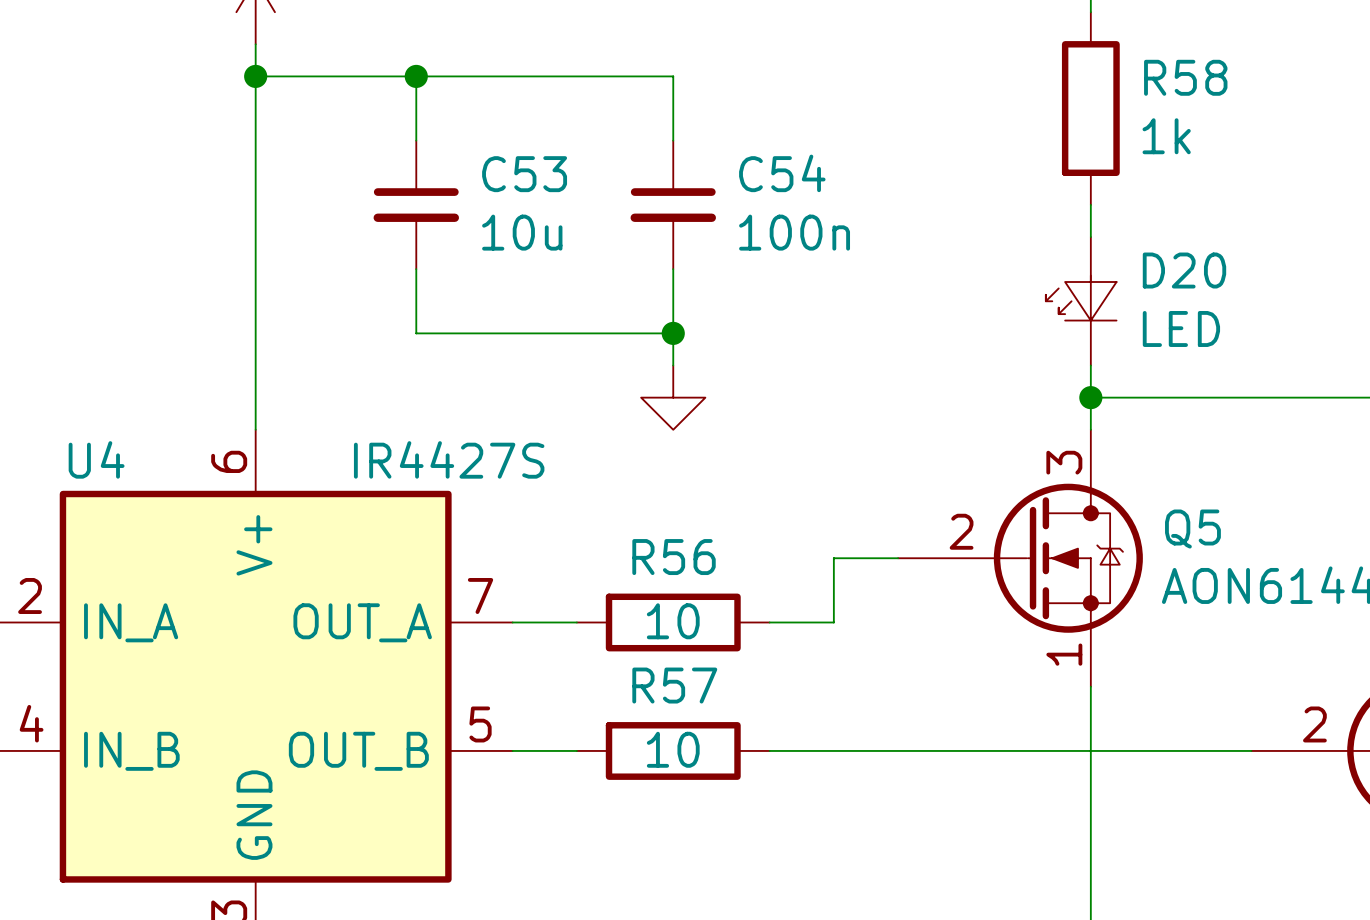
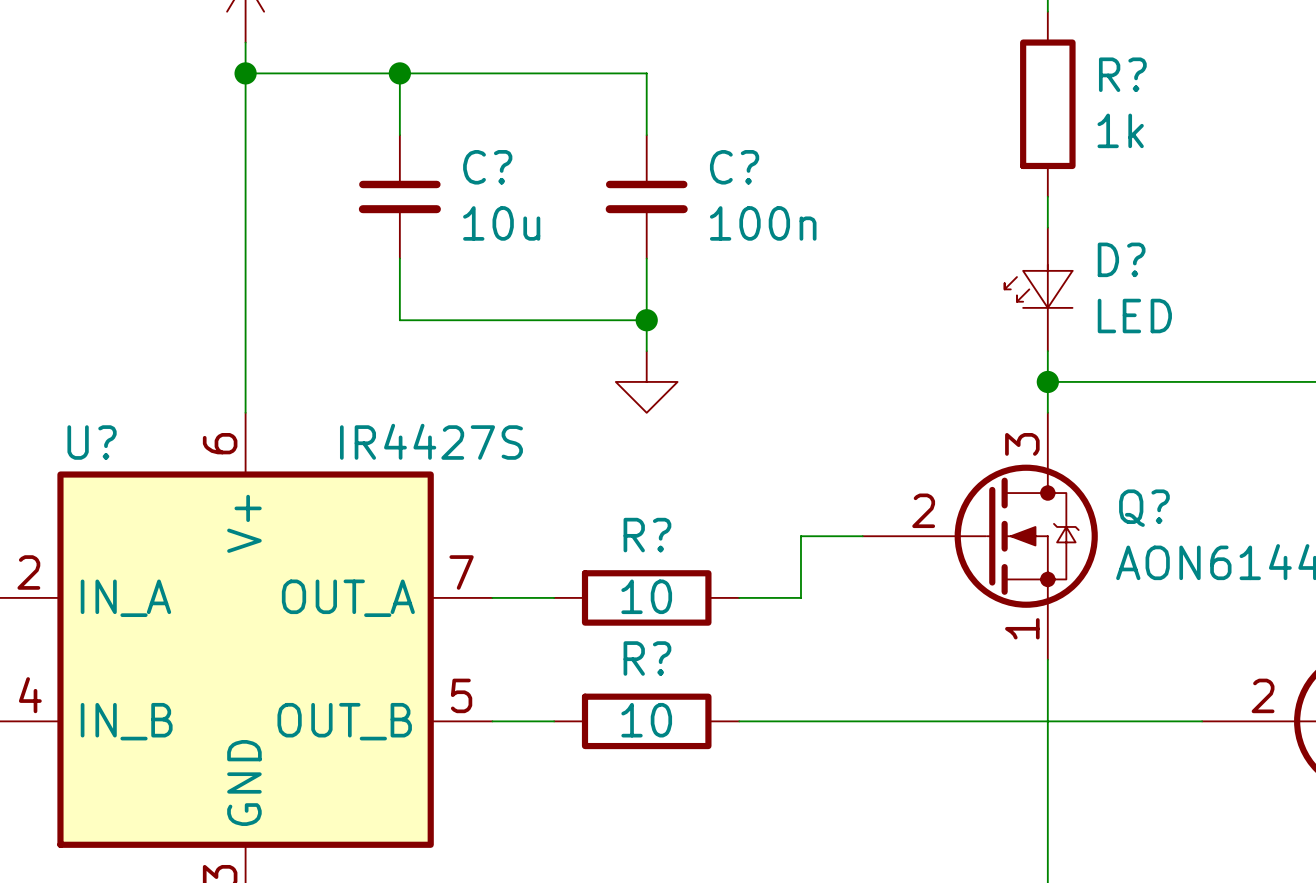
R58 name: R58 (1185, 77) -> R? (1122, 74)
C54 name: C54 (782, 173) -> C? (734, 167)
C53 name: C53 (524, 174) -> C? (487, 167)
D20 name: D20 (1184, 270) -> D? (1121, 259)
U4 name: U4 (96, 459) -> U? (92, 442)
Q5 name: Q5 (1192, 529) -> Q? (1144, 508)
R56 name: R56 (674, 557) -> R? (647, 535)
R57 name: R57 (674, 685) -> R? (647, 658)

